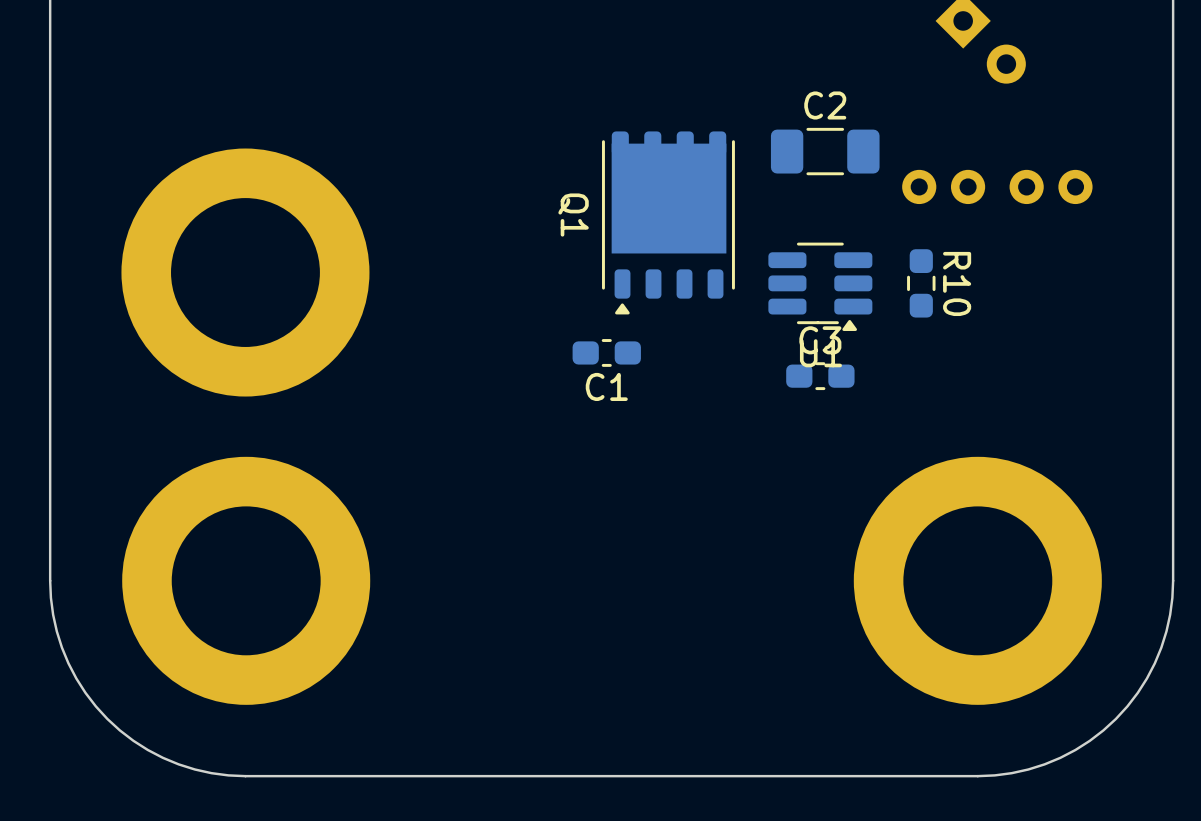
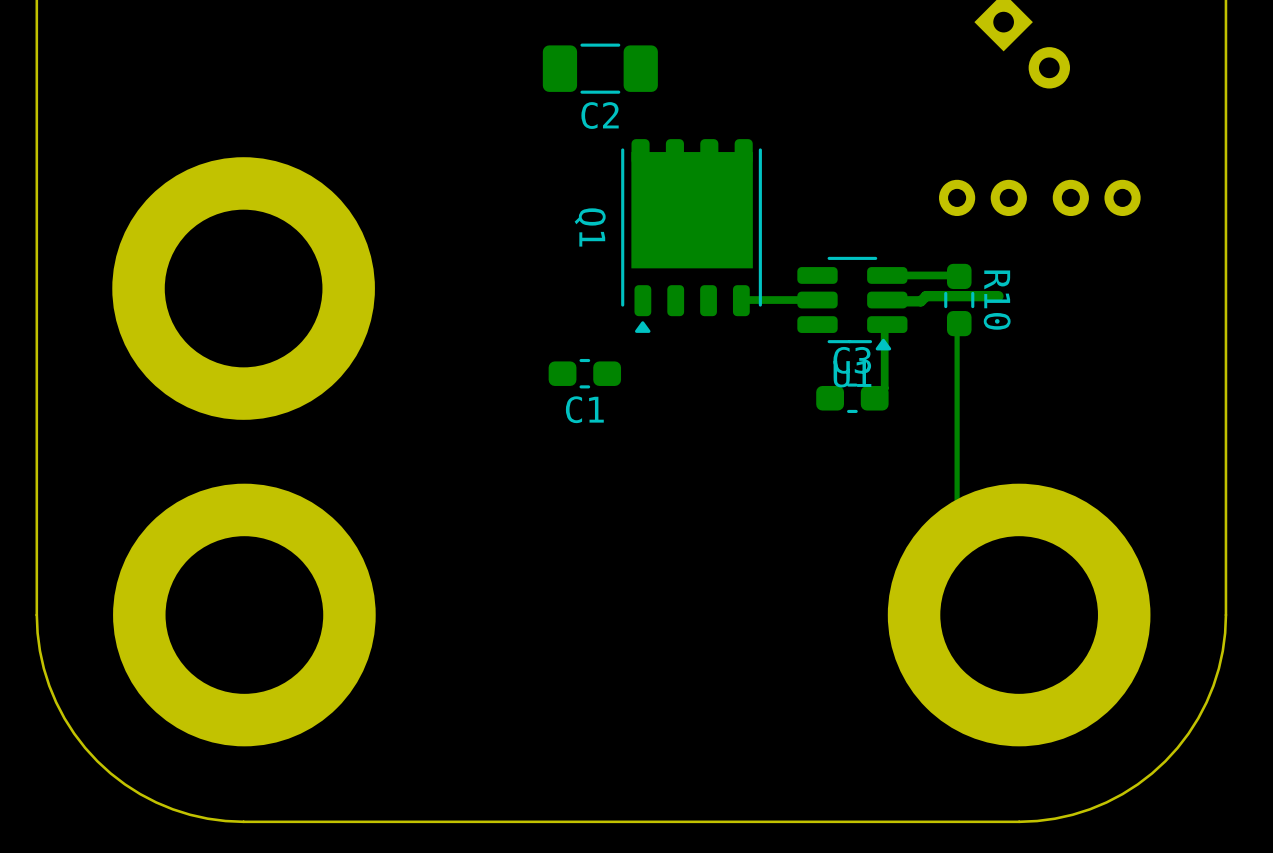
C2 name position: C2 (825, 105) -> C2 (600, 115)
C2 position: (825, 151) -> (600, 68)
track: none -> (957, 272) (954, 275) (887, 275)
track: none -> (998, 296) (926, 296) (920, 301) (887, 300)
track: none -> (817, 300) (741, 300)
track: none -> (957, 319) (957, 552) (1019, 615)
track: none -> (887, 324) (884, 327) (884, 388) (874, 398)
C1 position: (606, 352) -> (584, 373)

